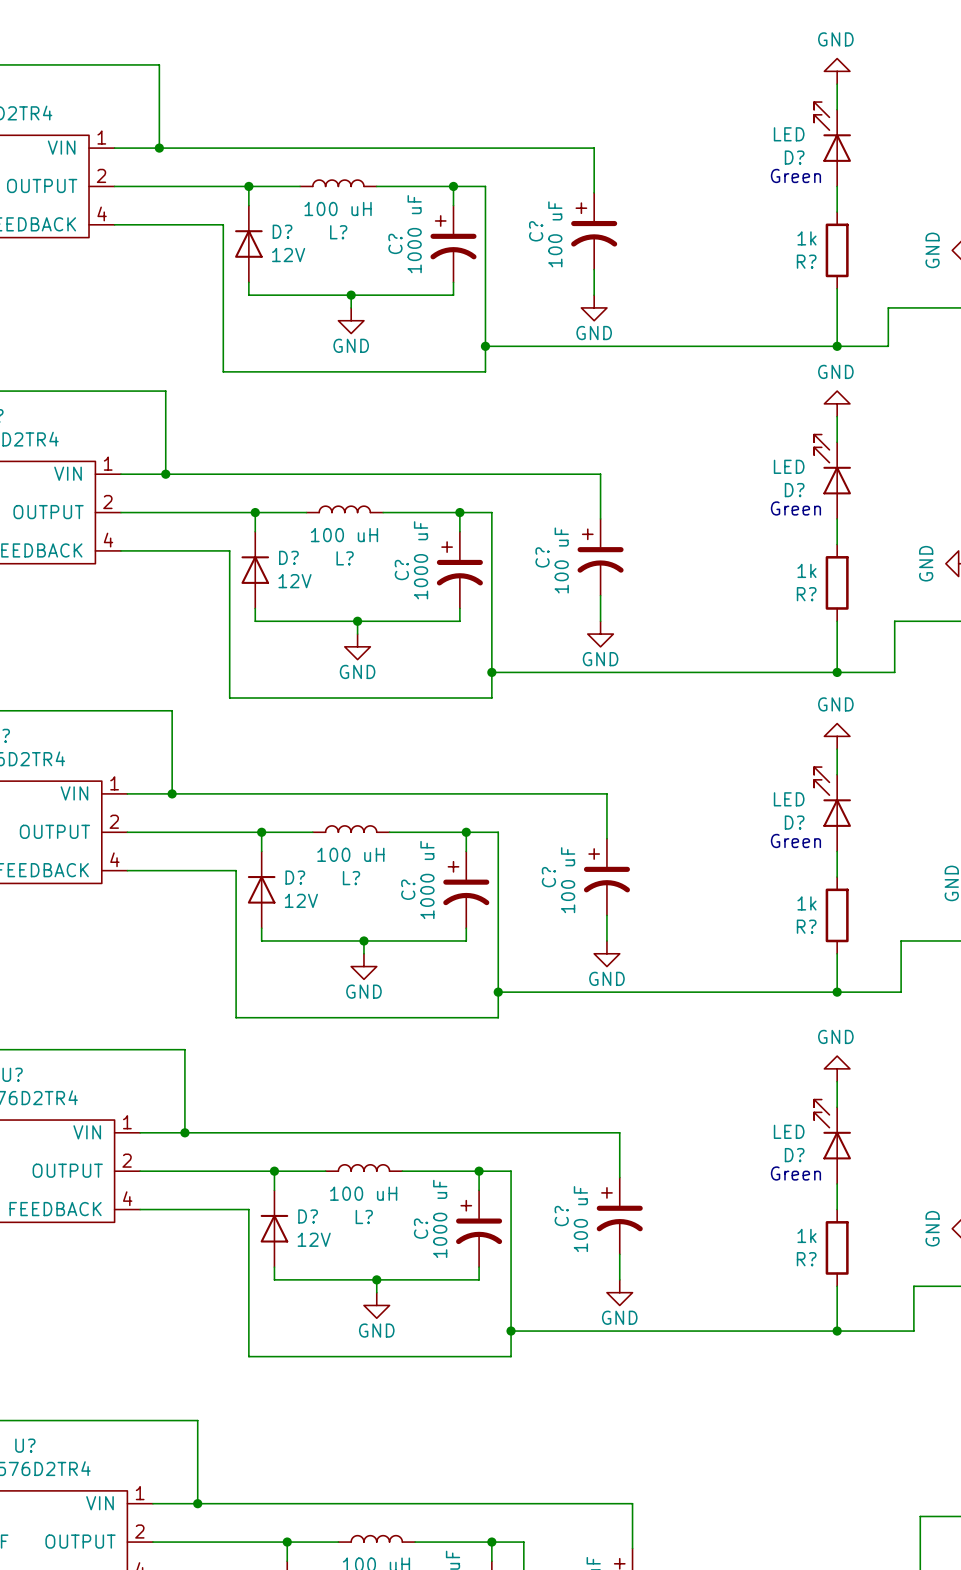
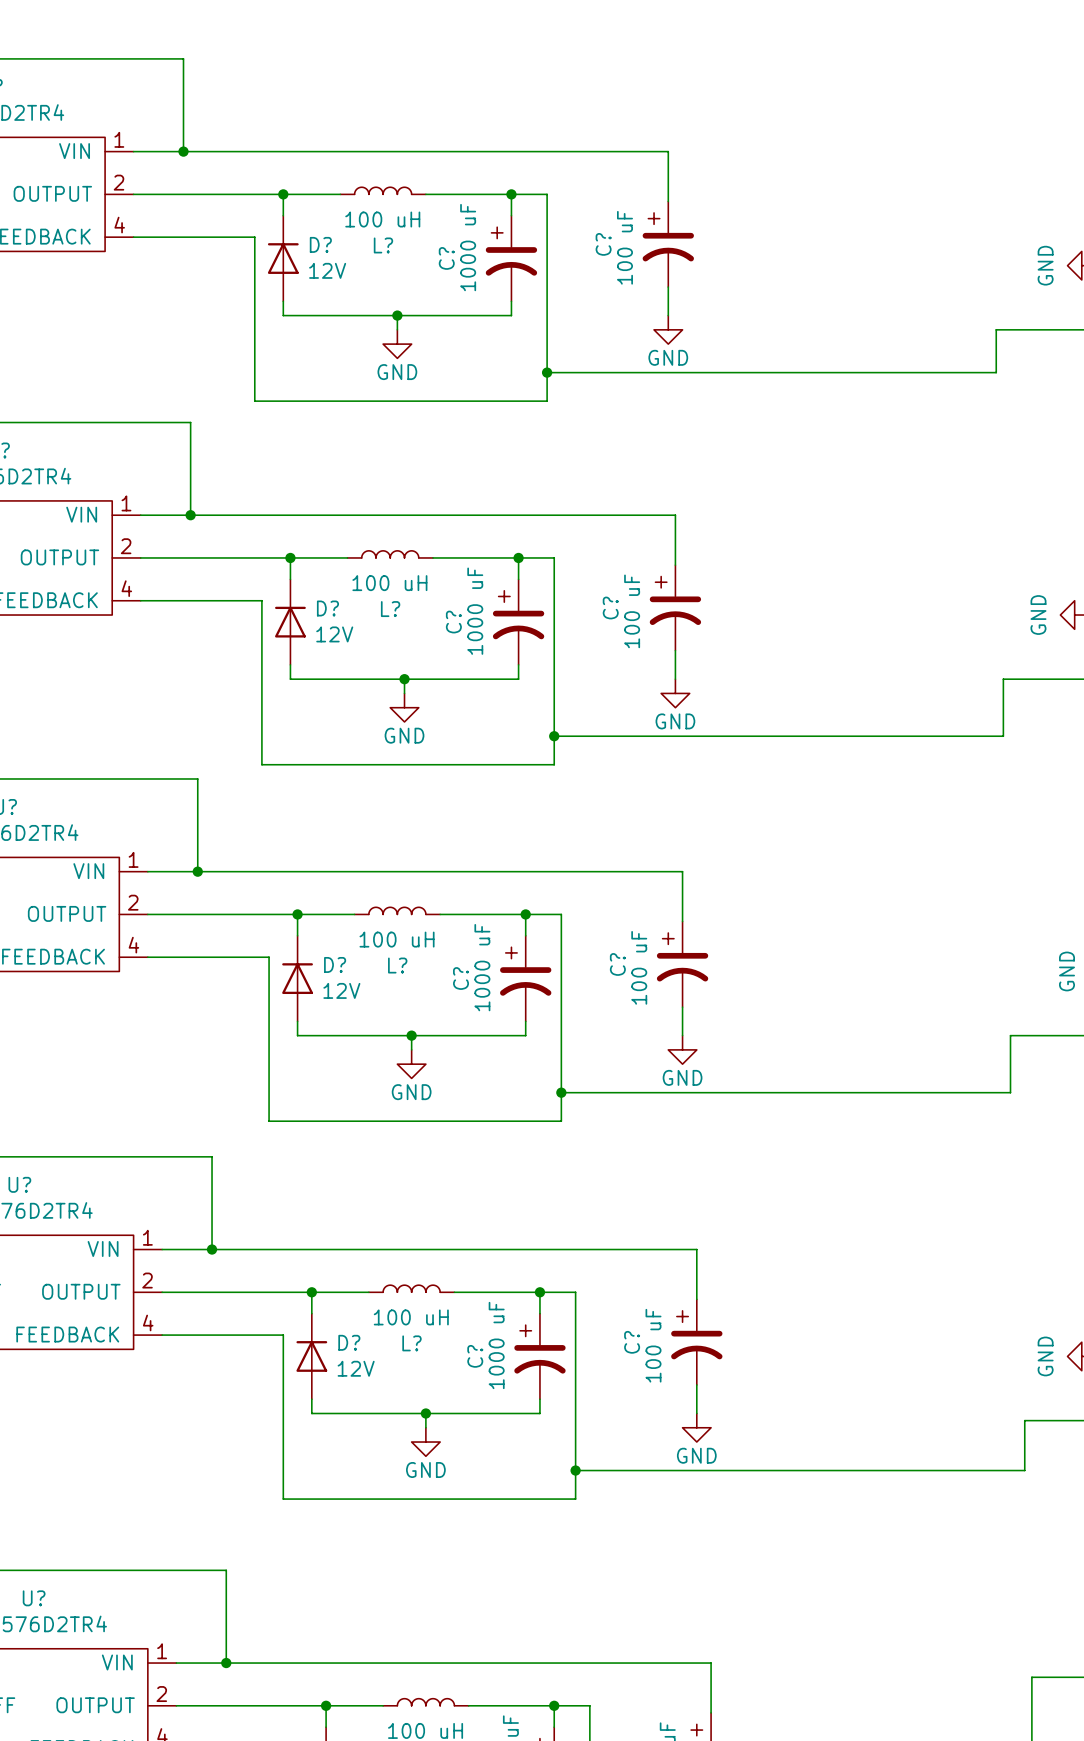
power symbol: GND (837, 71) -> none
wire: (837, 84) (837, 109) -> none
D?: LED (832, 144) -> none
text: Green (795, 175) -> none
wire: (837, 186) (837, 212) -> none
R?: 1k (837, 250) -> none
wire: (837, 288) (837, 346) -> none
junction: (837, 346) -> none
power symbol: GND (837, 403) -> none
wire: (837, 416) (837, 442) -> none
D?: LED (832, 476) -> none
text: Green (795, 508) -> none
wire: (837, 518) (837, 544) -> none
R?: 1k (837, 582) -> none
wire: (837, 621) (837, 672) -> none
junction: (837, 672) -> none
power symbol: GND (837, 736) -> none
wire: (837, 749) (837, 774) -> none
D?: LED (832, 809) -> none
text: Green (795, 840) -> none
wire: (837, 851) (837, 877) -> none
R?: 1k (837, 915) -> none
wire: (837, 953) (837, 992) -> none
junction: (837, 992) -> none
power symbol: GND (837, 1068) -> none
wire: (837, 1081) (837, 1107) -> none
D?: LED (832, 1141) -> none
text: Green (795, 1173) -> none
wire: (837, 1183) (837, 1209) -> none
R?: 1k (837, 1247) -> none
wire: (837, 1286) (837, 1331) -> none
junction: (837, 1331) -> none

